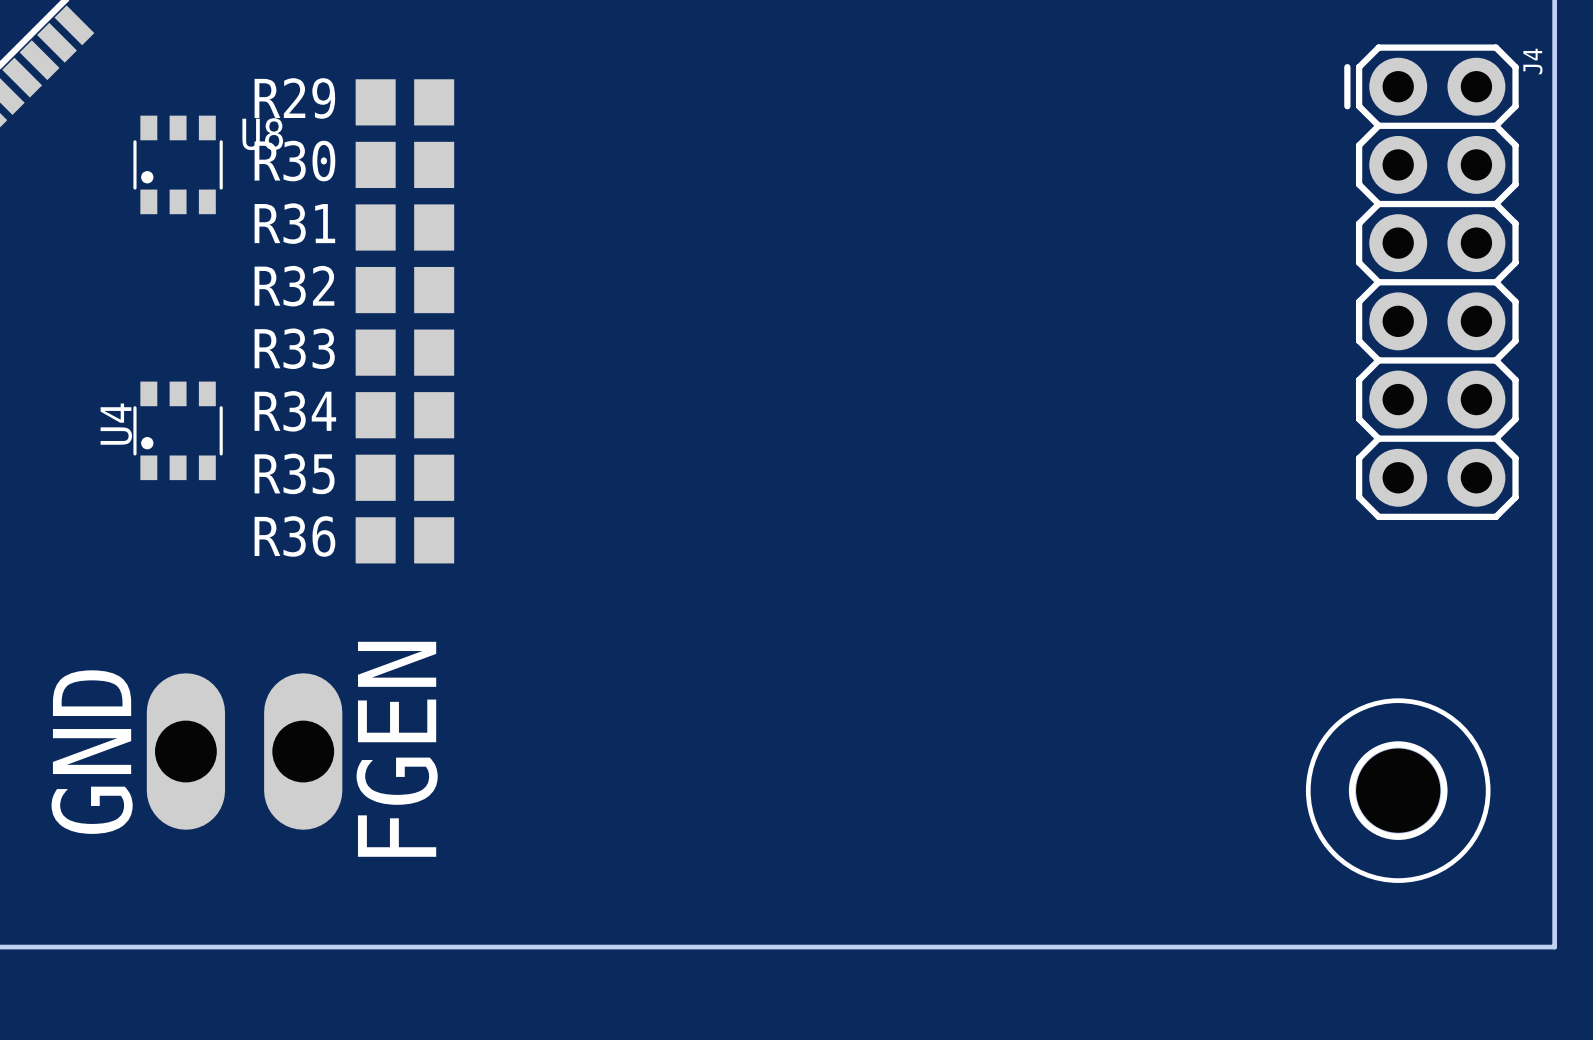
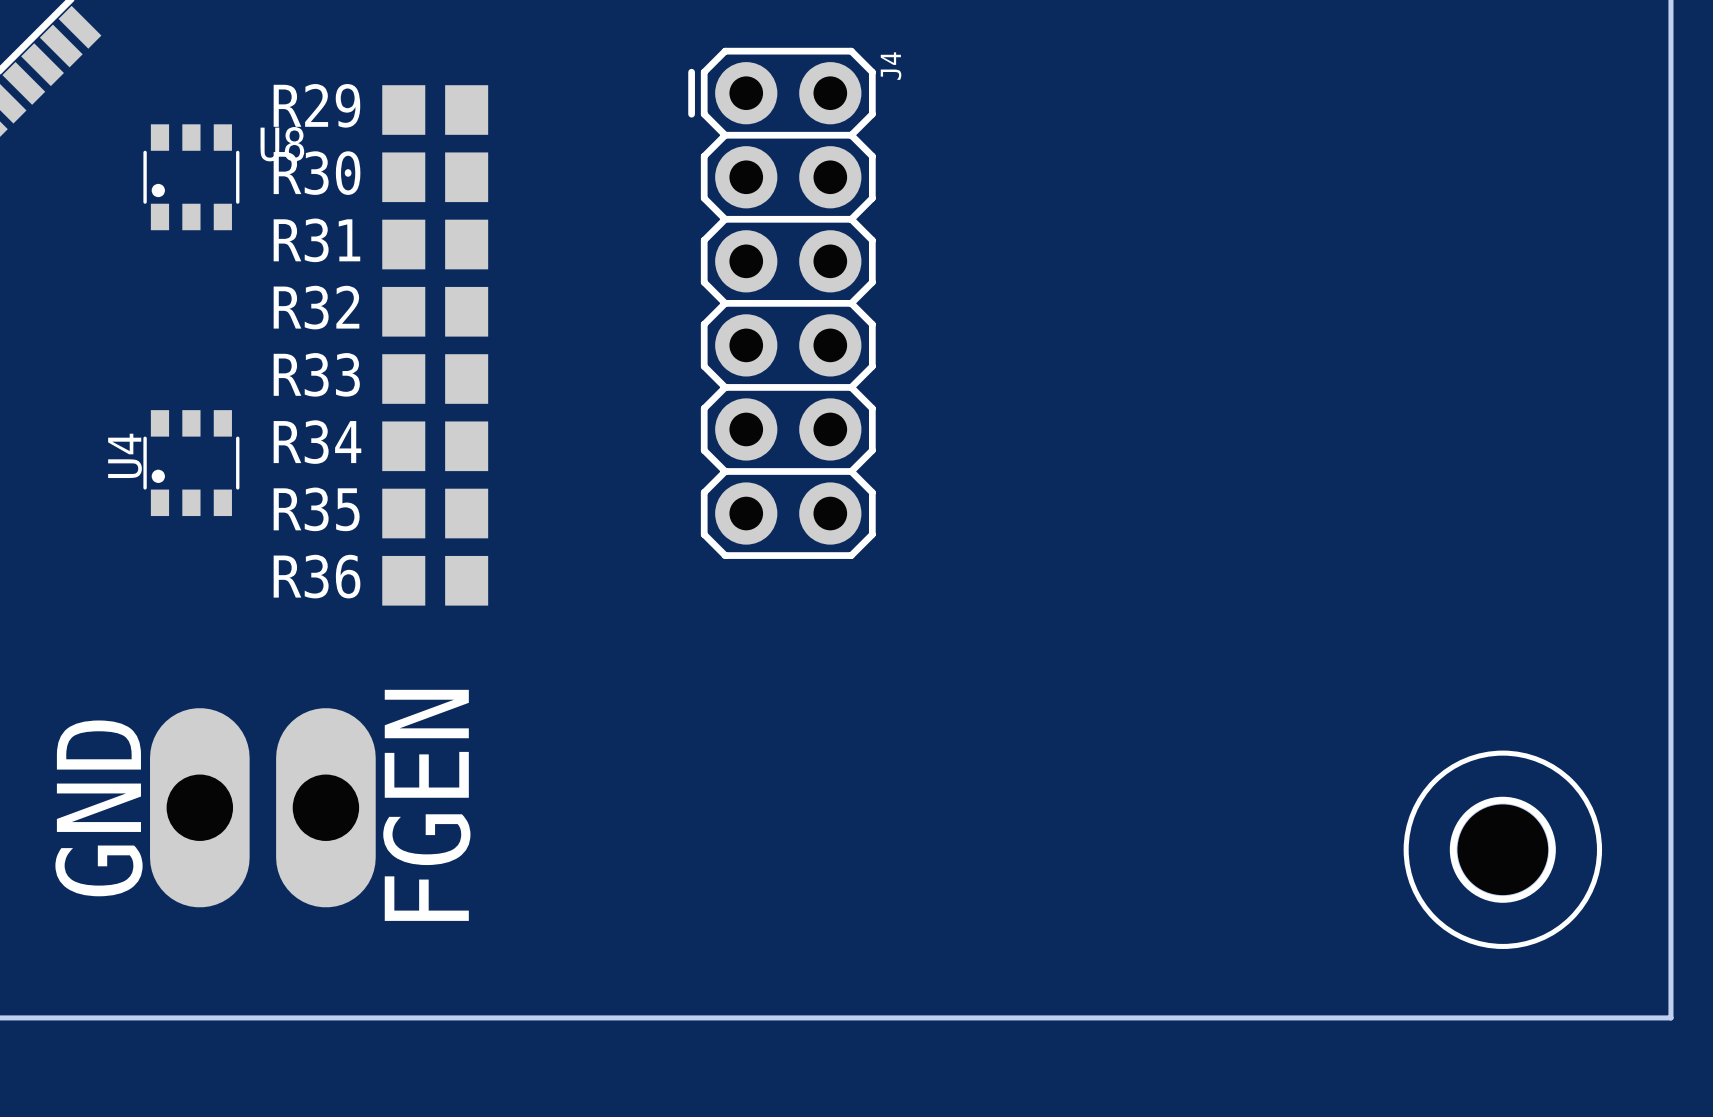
J4 position: (1431, 282) -> (781, 303)
part footprint: [146, 673, 226, 830] -> [150, 708, 250, 908]
FGEN footprint: [264, 673, 343, 830] -> [276, 708, 376, 908]

